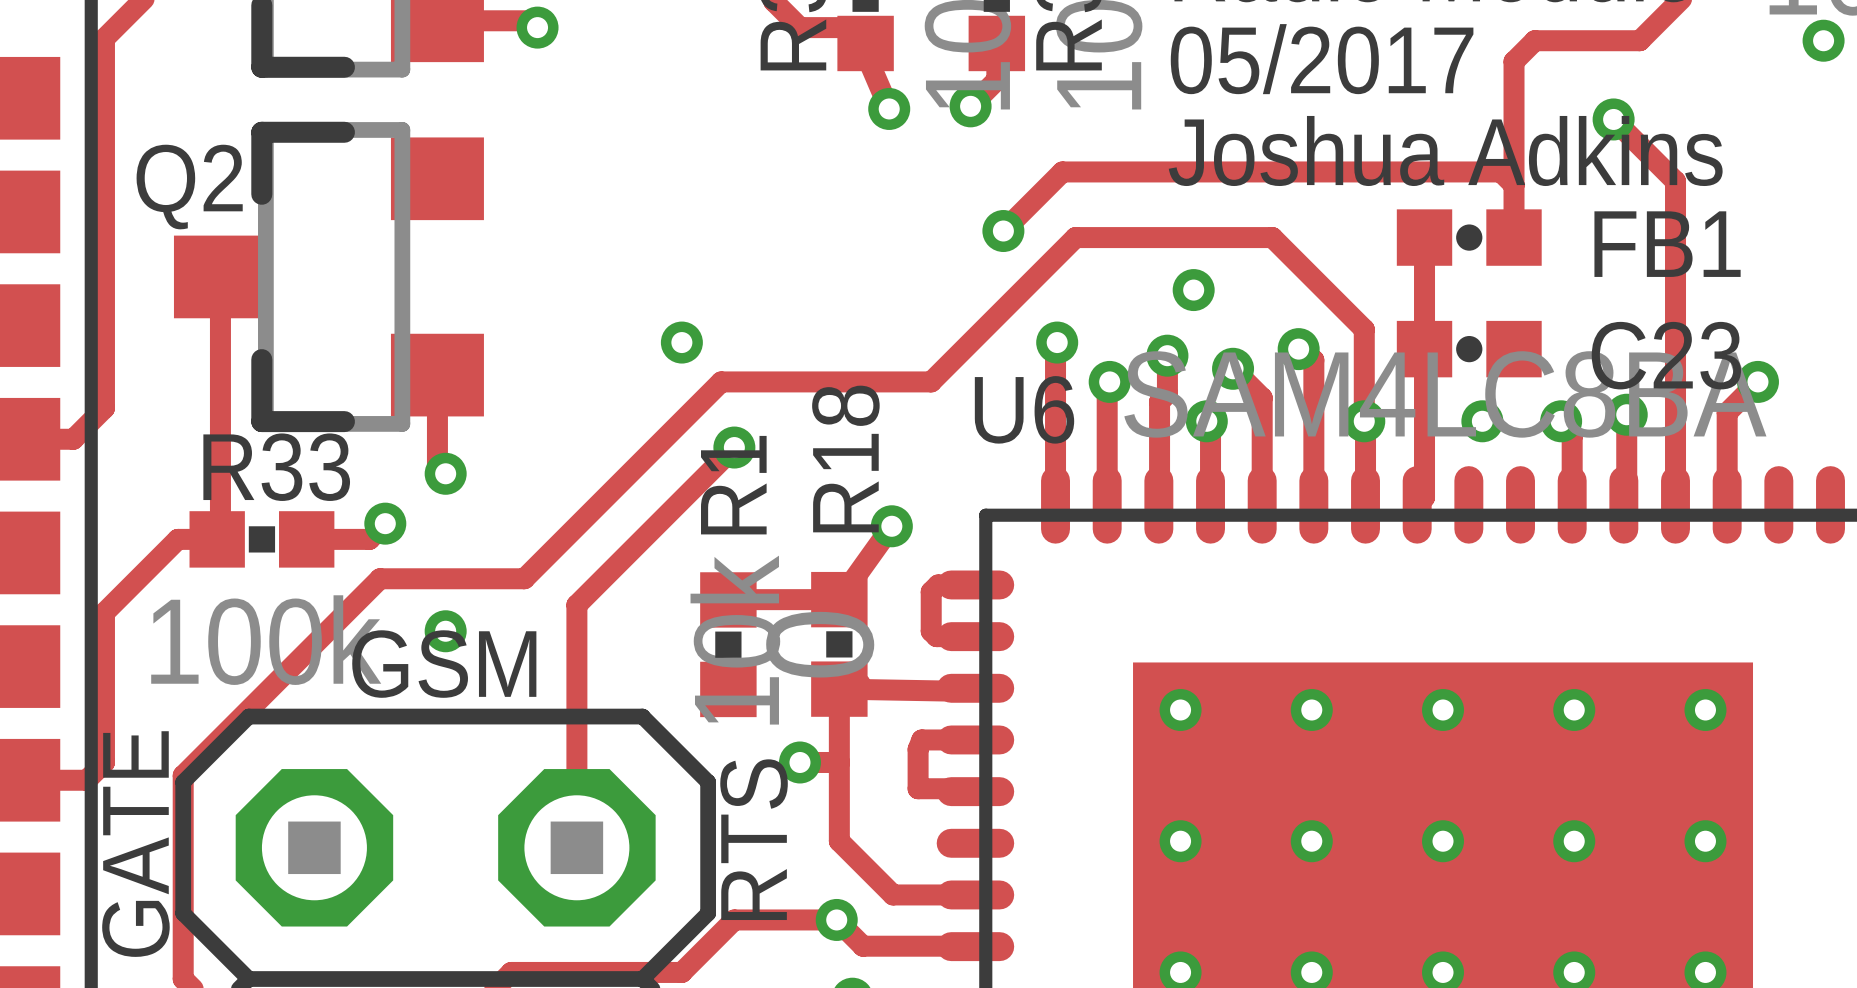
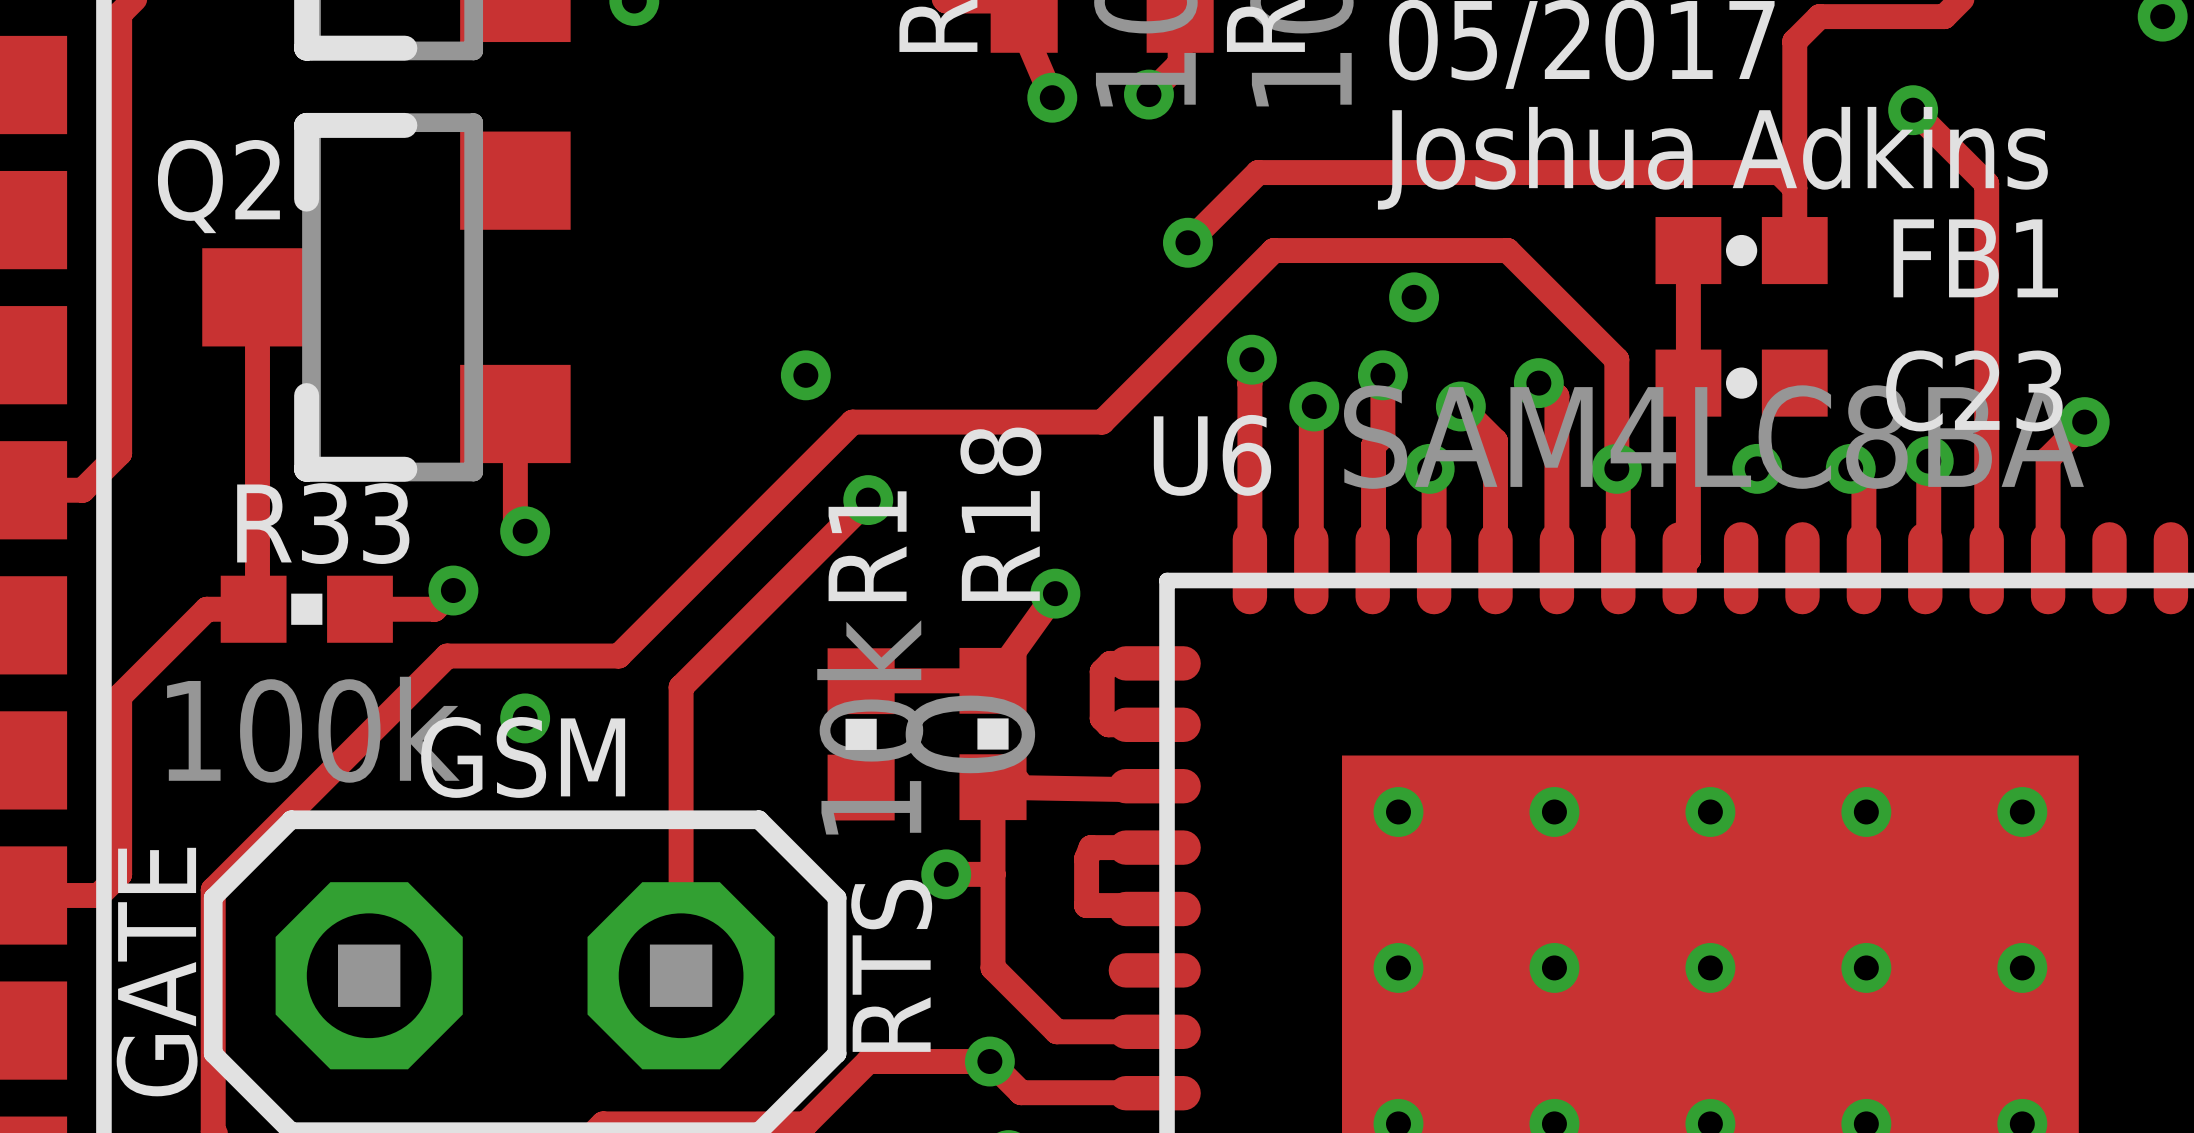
via position: (1193, 290) -> (1414, 297)
via position: (1057, 342) -> (1251, 359)
via position: (1167, 355) -> (1382, 375)
via position: (1109, 381) -> (1314, 406)

